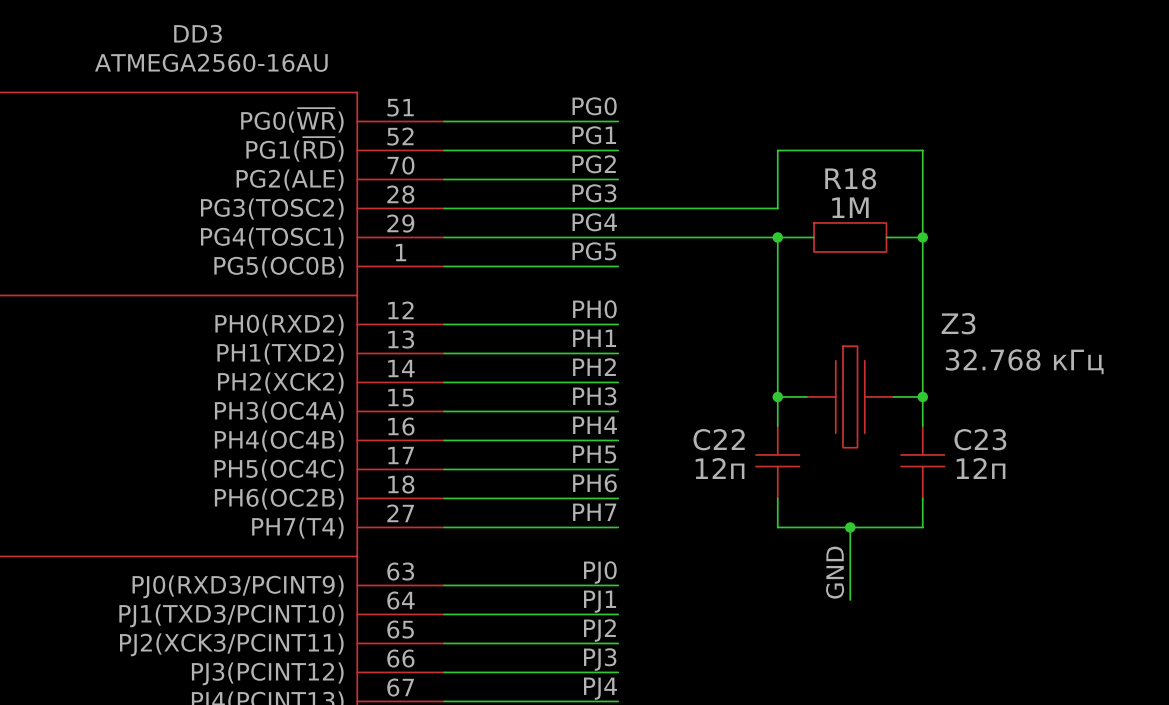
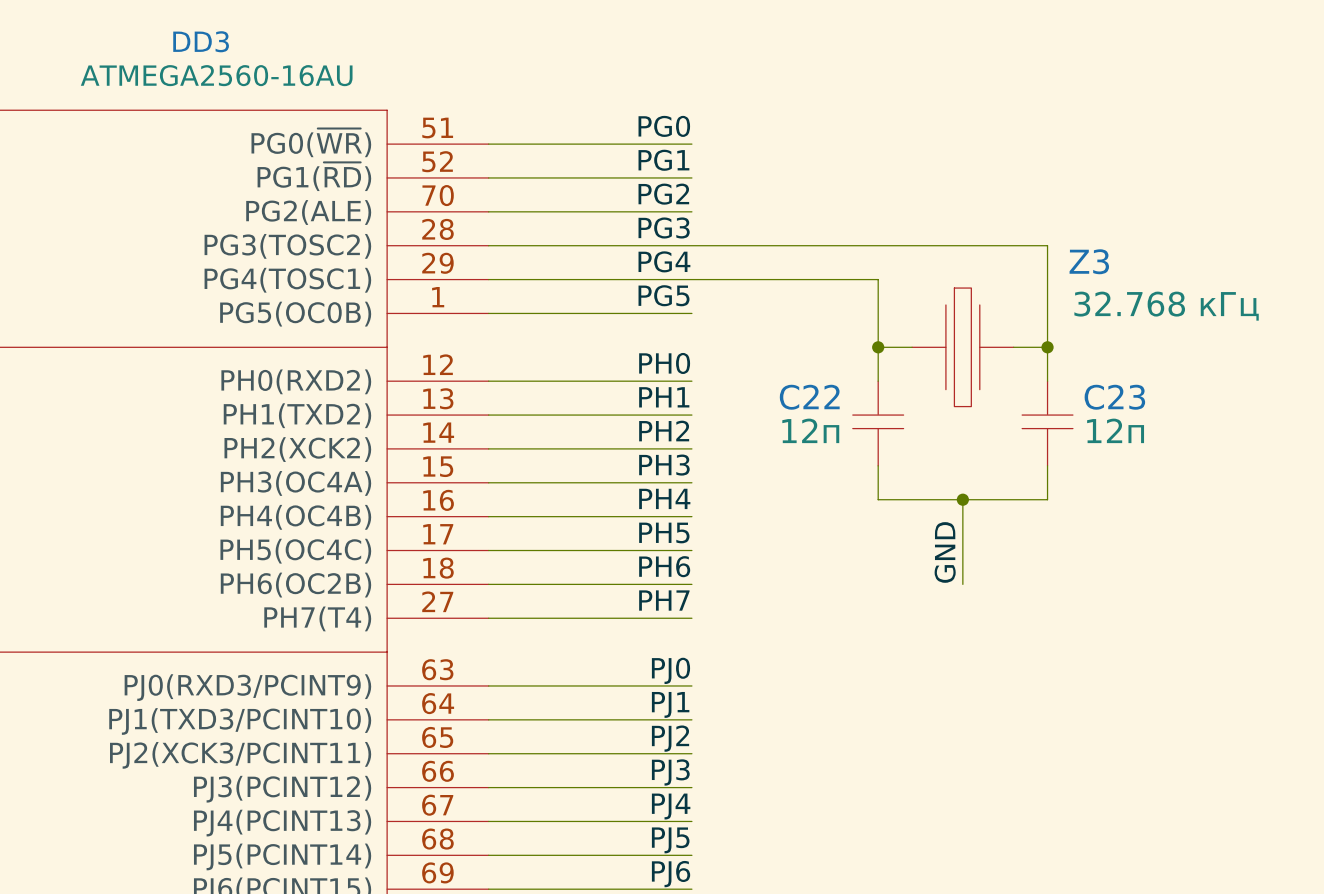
wire: (777, 208) (777, 150) (922, 150) (922, 208) -> (878, 245) (1047, 245)
wire: (777, 237) (814, 237) -> none
junction: (777, 237) -> none
R18: 1M (850, 237) -> none
wire: (886, 237) (922, 237) -> none
junction: (922, 237) -> none
wire: none -> (878, 347) (912, 347)
junction: none -> (878, 347)
wire: none -> (1013, 347) (1047, 347)
junction: none -> (1047, 347)
wire: (777, 324) (777, 396) (806, 396) -> none
wire: (922, 324) (922, 396) (893, 396) -> none
junction: (777, 396) -> none
Z3 position: (850, 396) -> (962, 347)
junction: (922, 396) -> none
wire: none -> (878, 499) (1047, 499)
junction: none -> (962, 499)
C22 position: (777, 462) -> (878, 423)
C23 position: (922, 462) -> (1047, 423)
wire: (777, 498) (777, 527) (922, 527) (922, 498) -> none
wire: (850, 527) (850, 599) -> (962, 499) (962, 584)
junction: (850, 527) -> none
label position: GND (835, 572) -> GND (945, 552)

